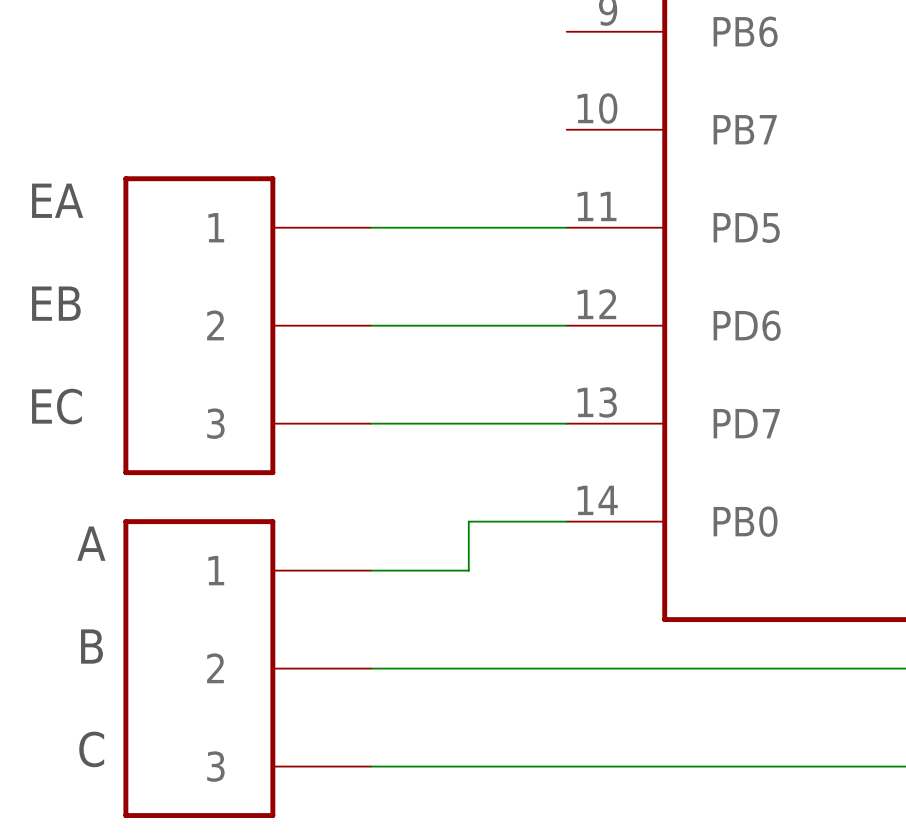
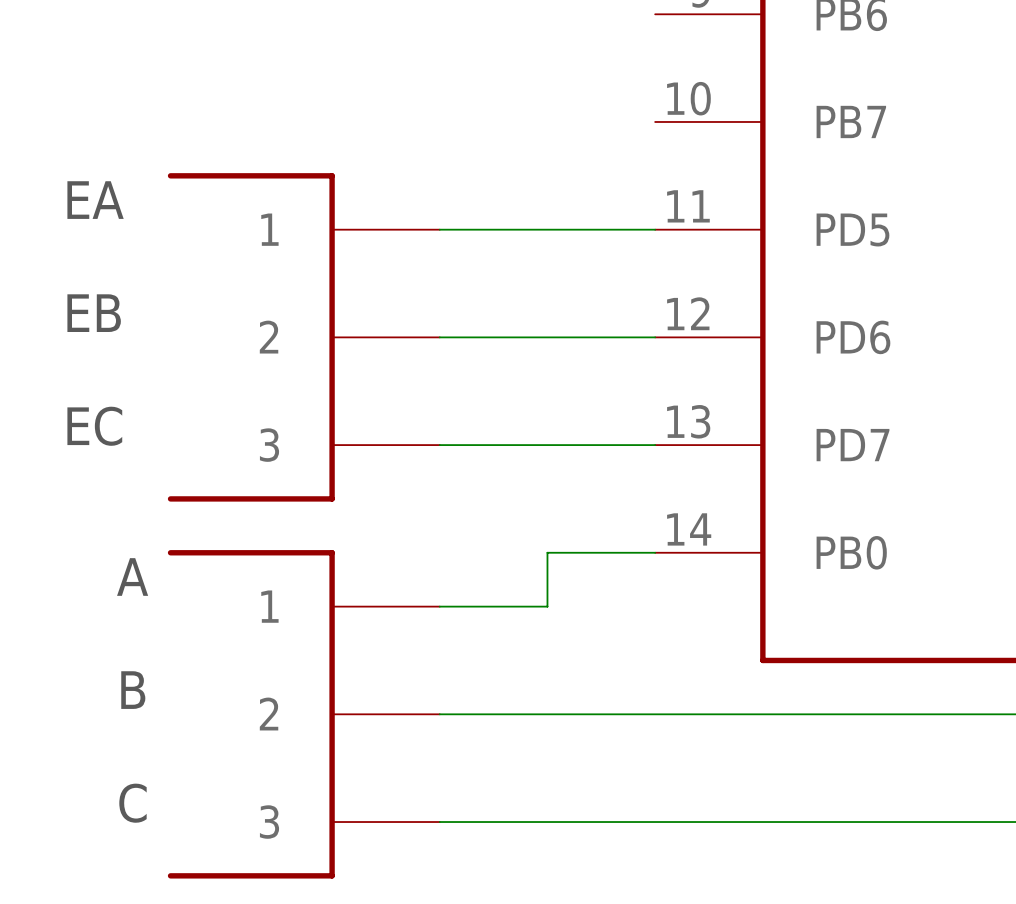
part symbol: [123, 176, 371, 476] -> [167, 173, 440, 502]
part symbol: [123, 519, 371, 818] -> [167, 550, 440, 879]

